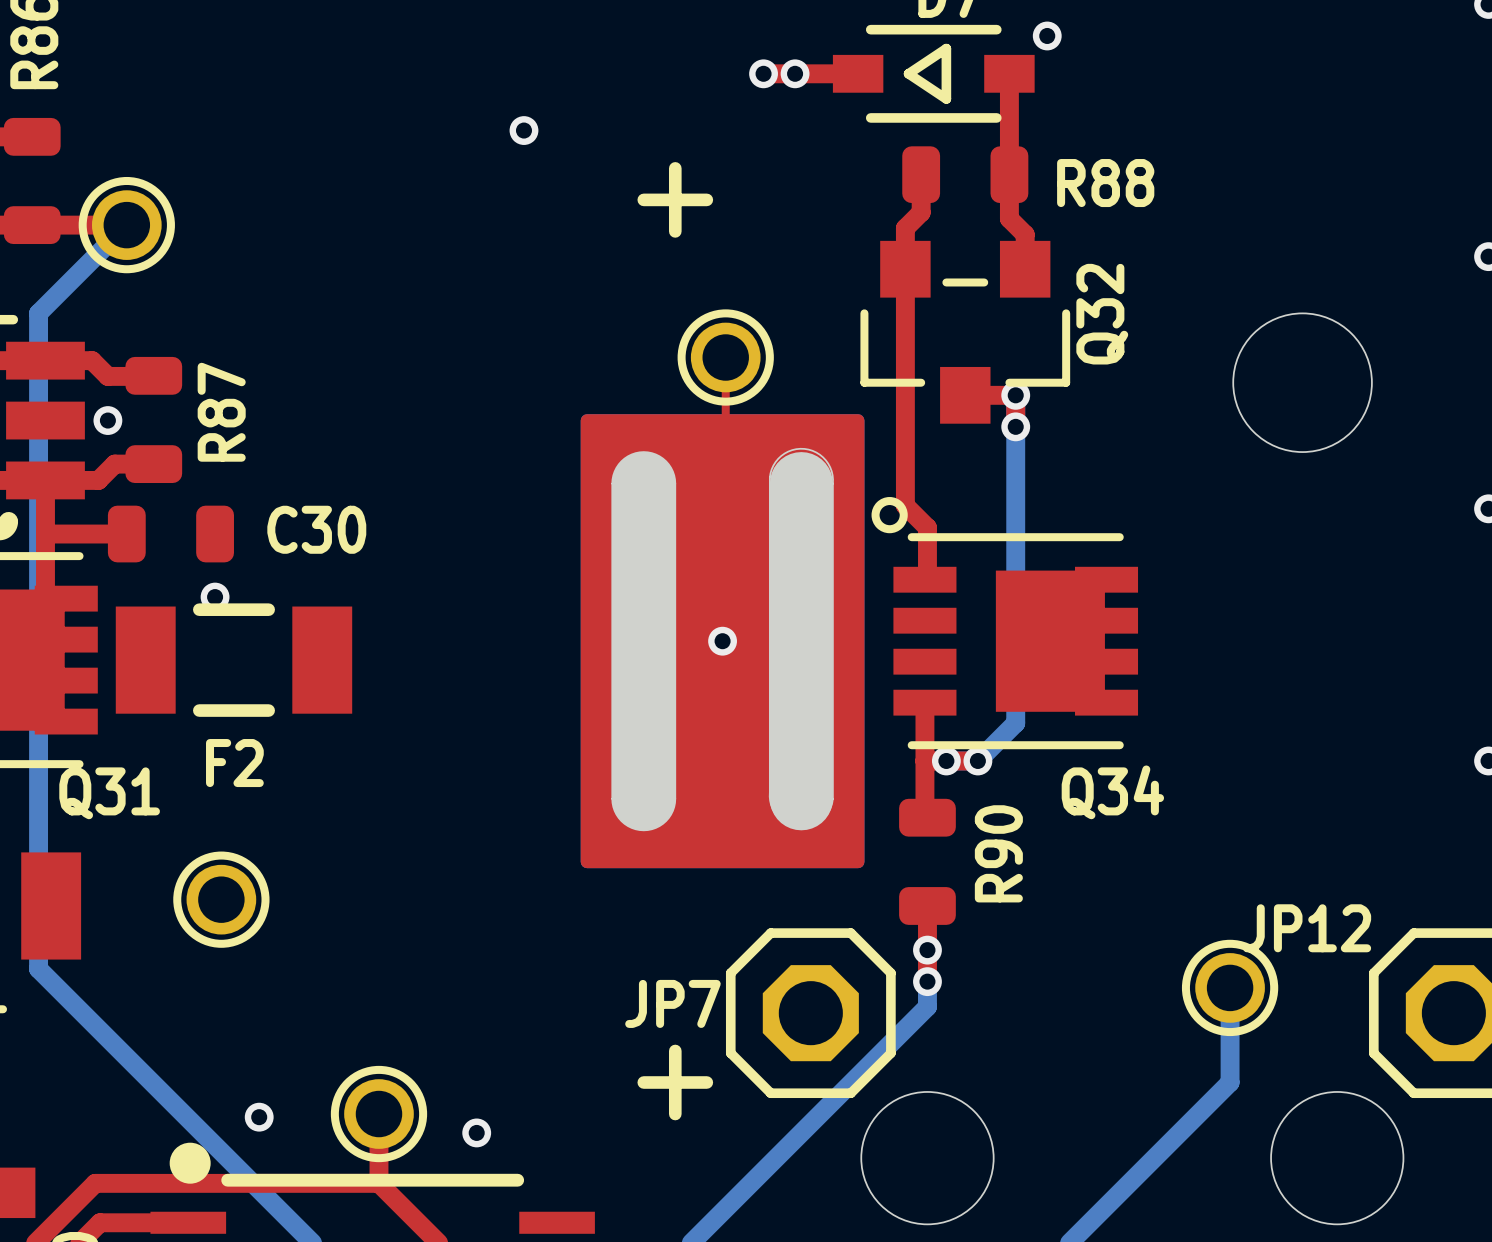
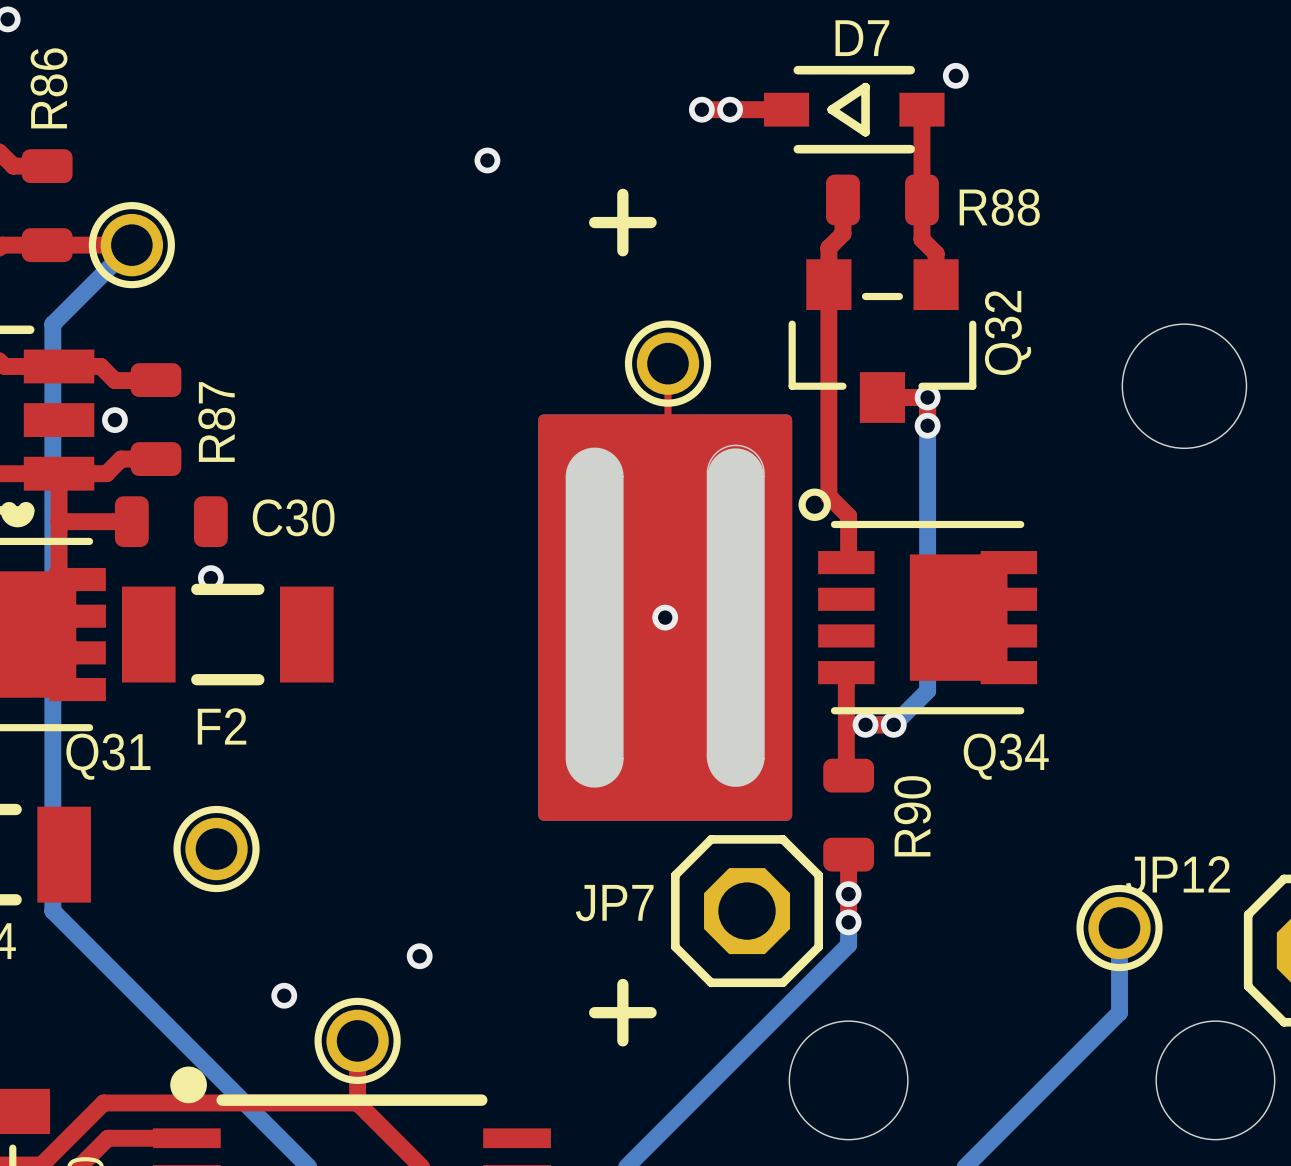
JP7 position: (810, 1013) -> (747, 911)
via: none -> (419, 956)
via position: (259, 1117) -> (284, 995)
via: (476, 1132) -> none

